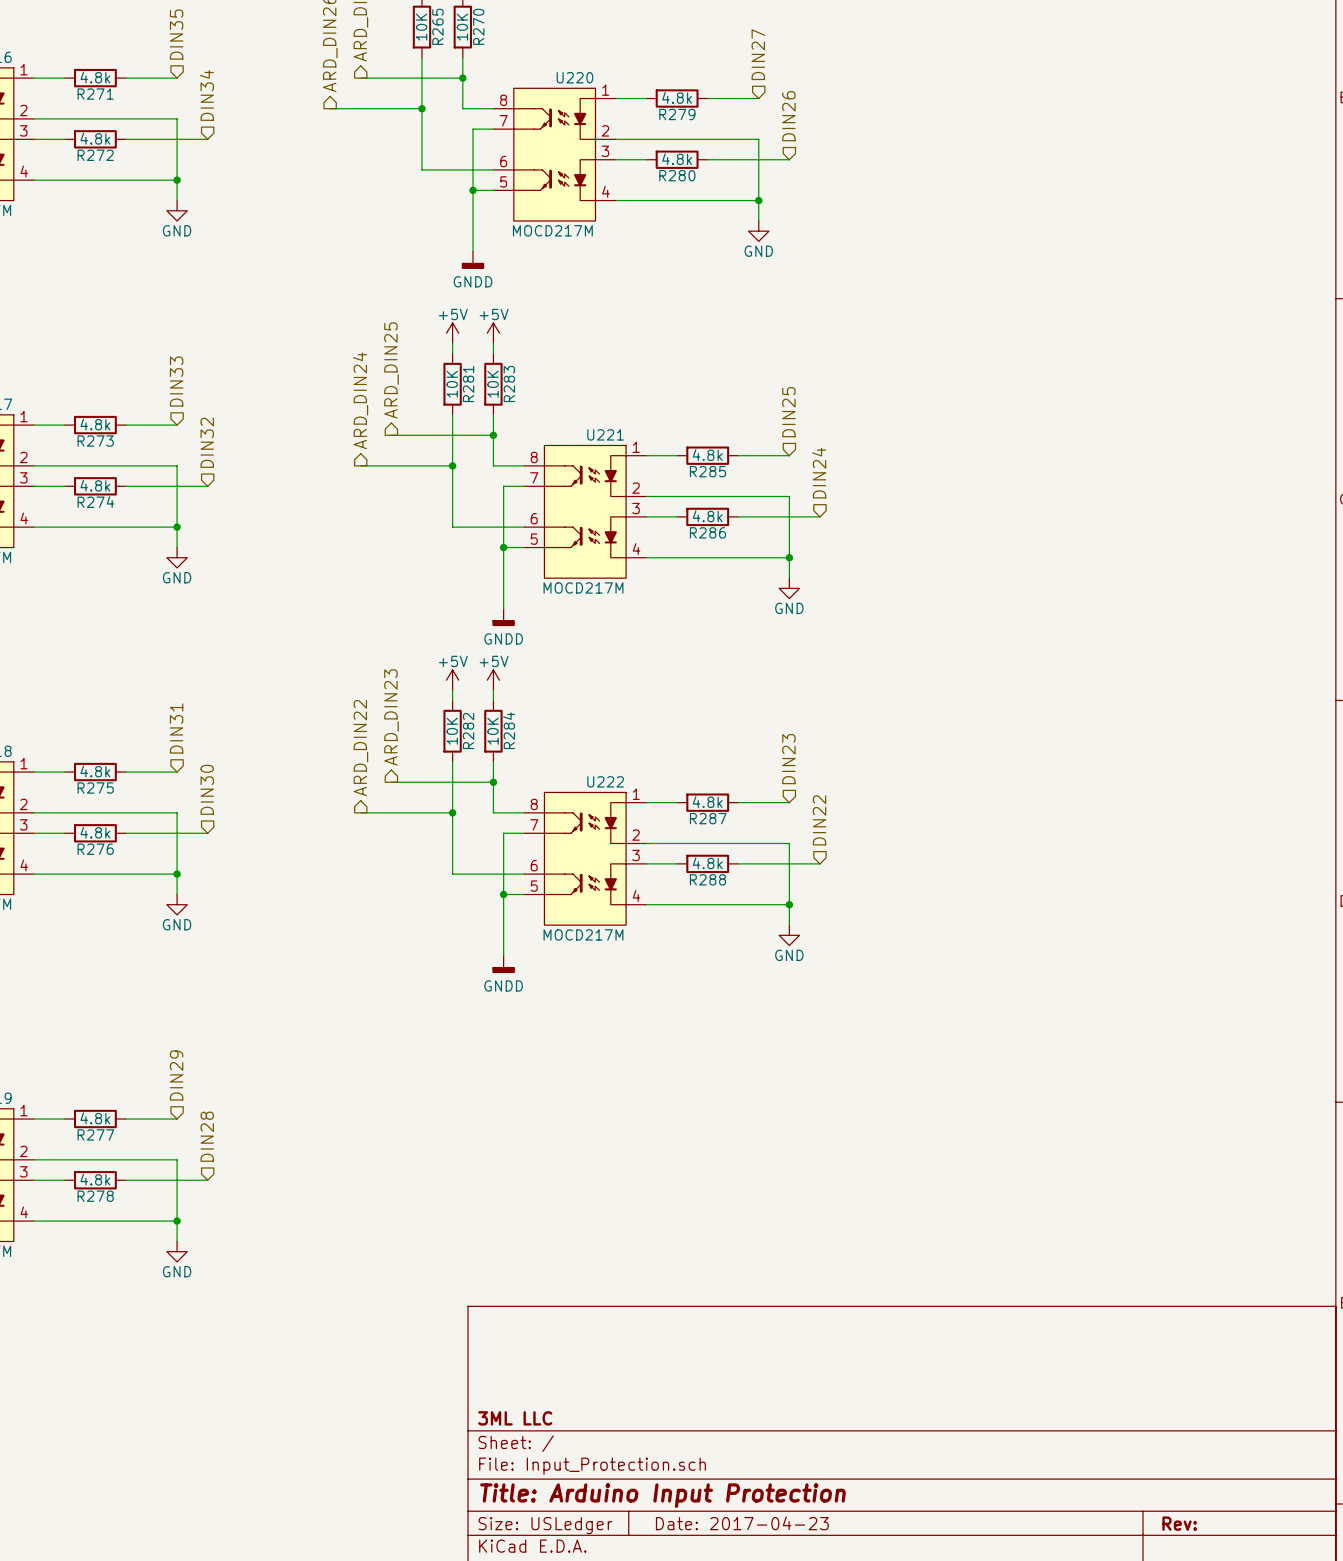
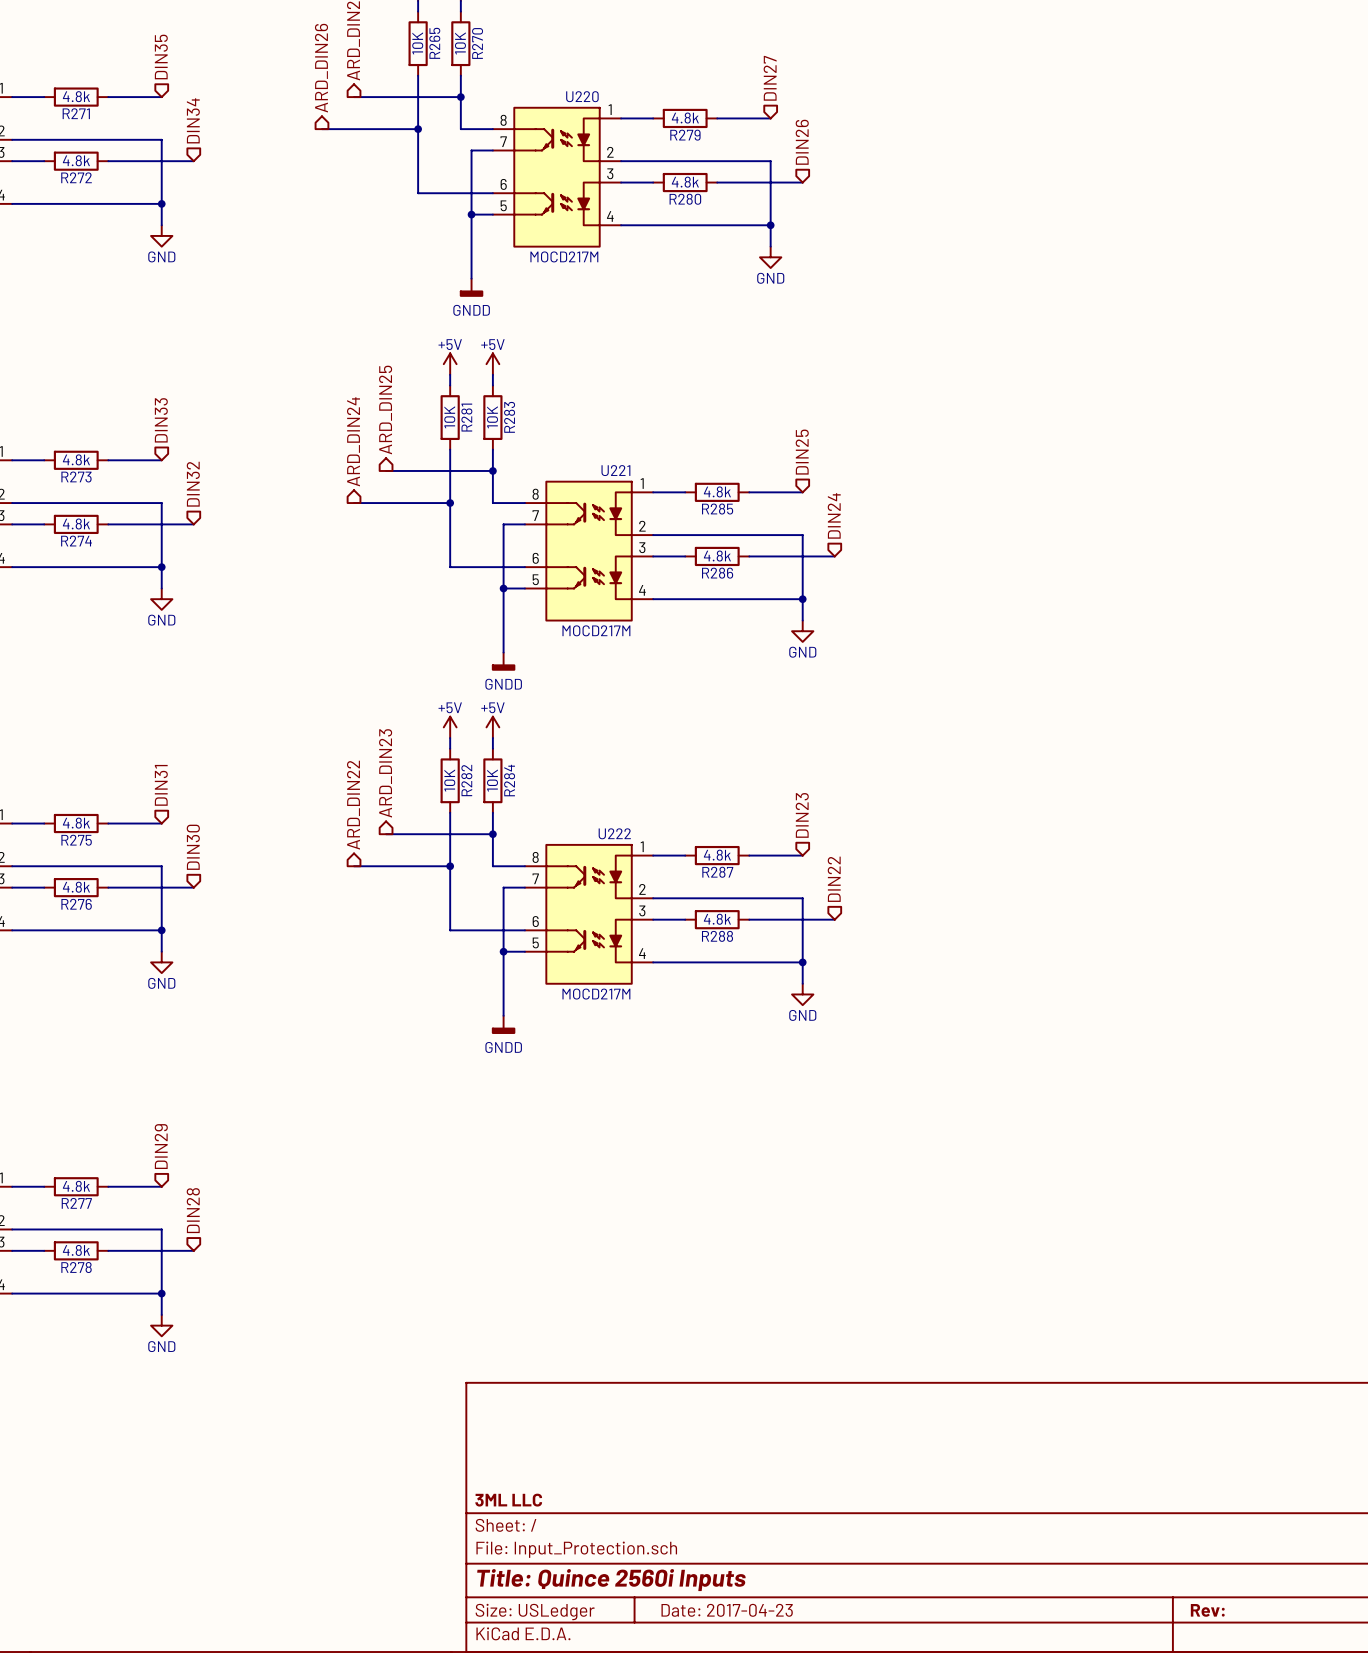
title block: Title: Arduino Input Protection (662, 1495) -> Title: Quince 2560i Inputs (611, 1580)

